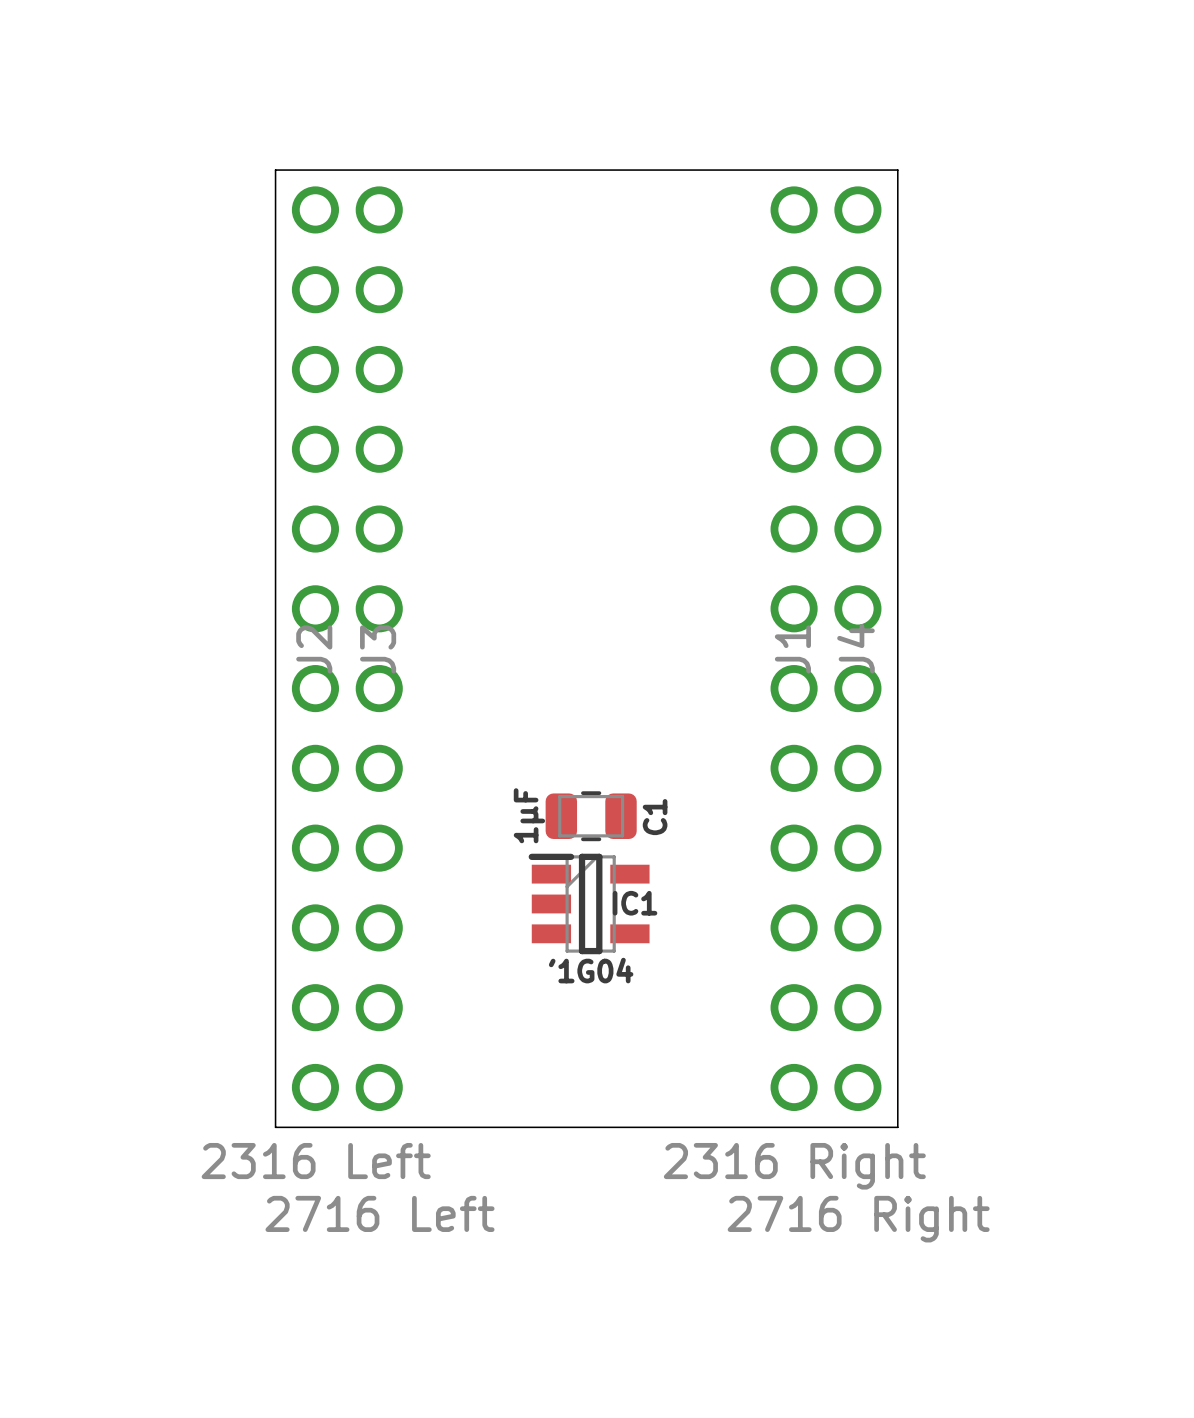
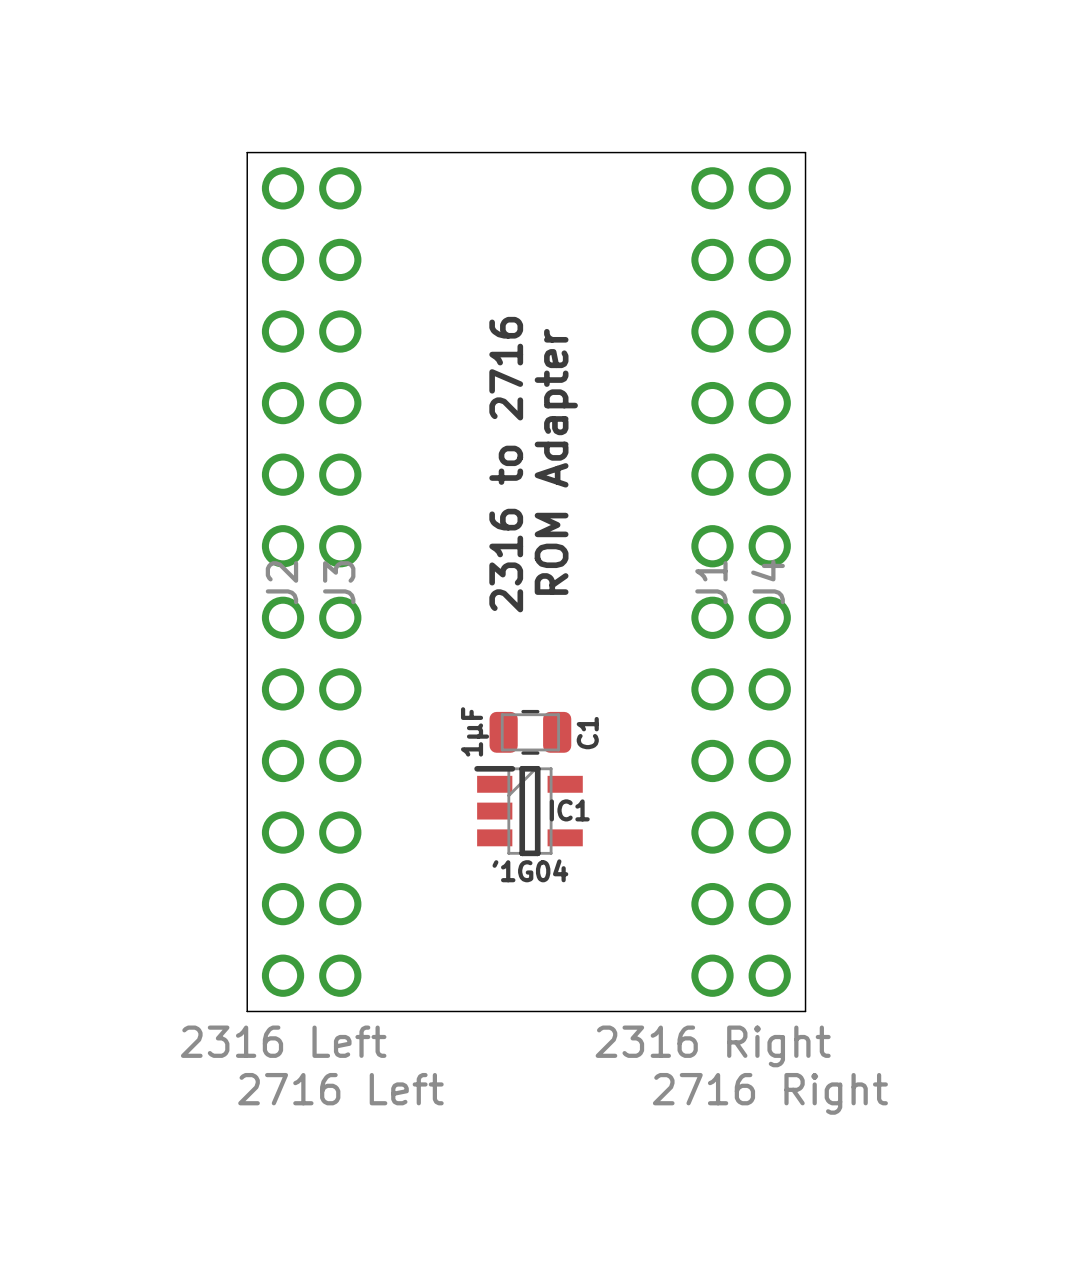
text: none -> ROM Adapter (556, 461)
text: none -> 2316 to 2716 (506, 464)

